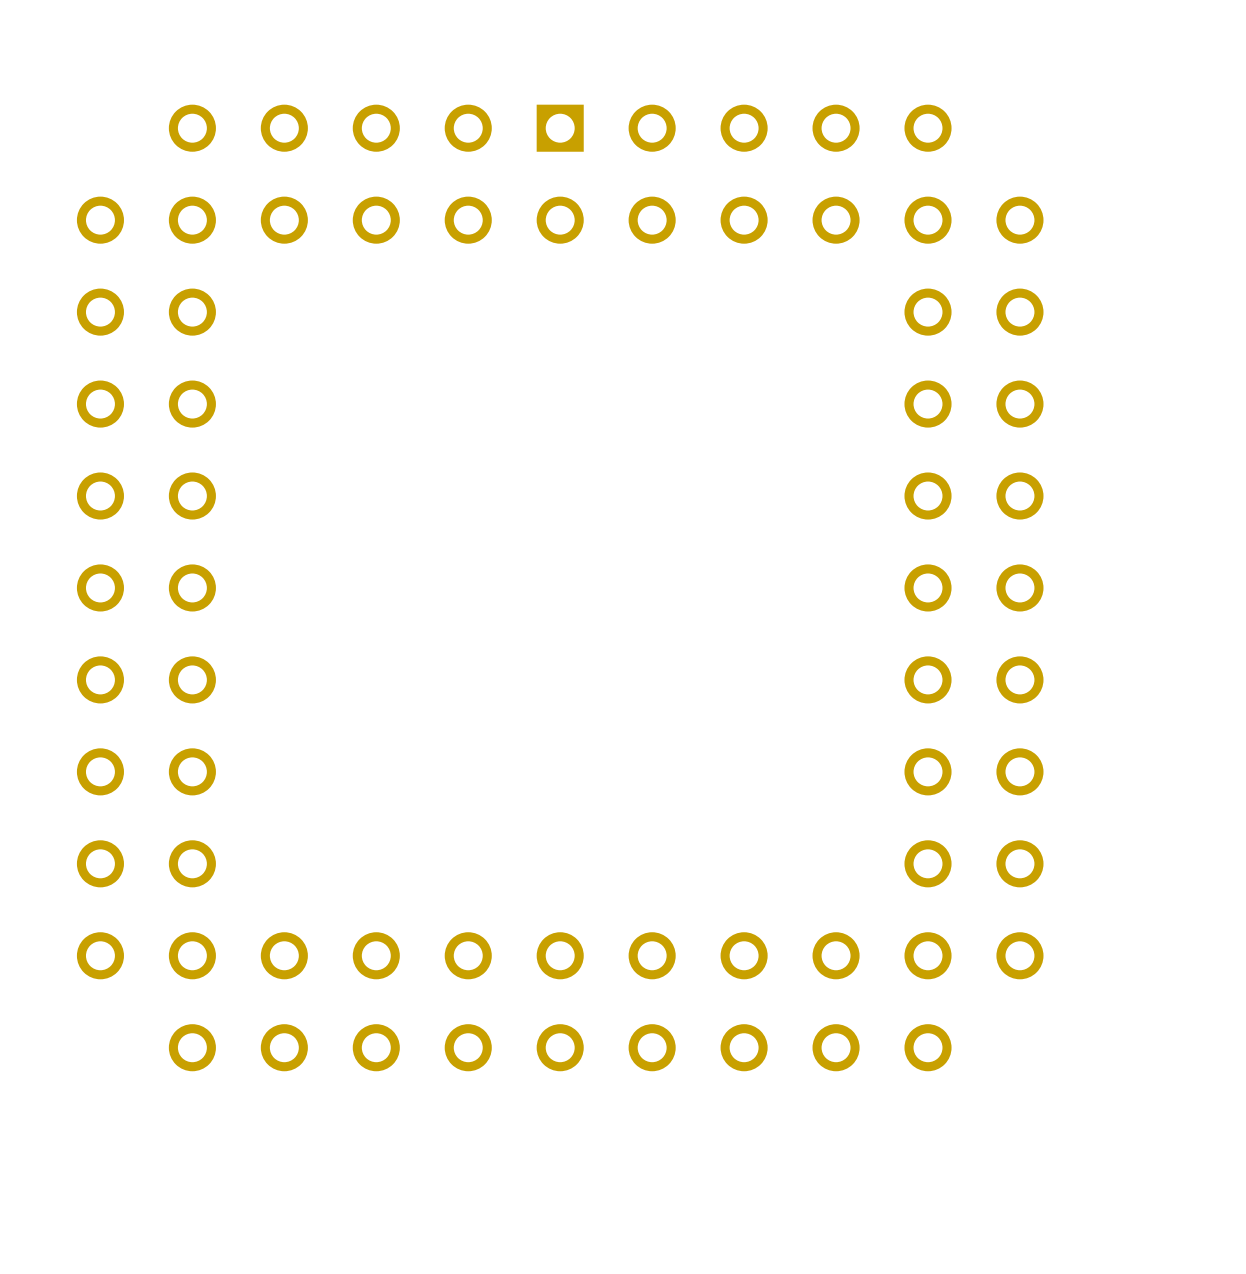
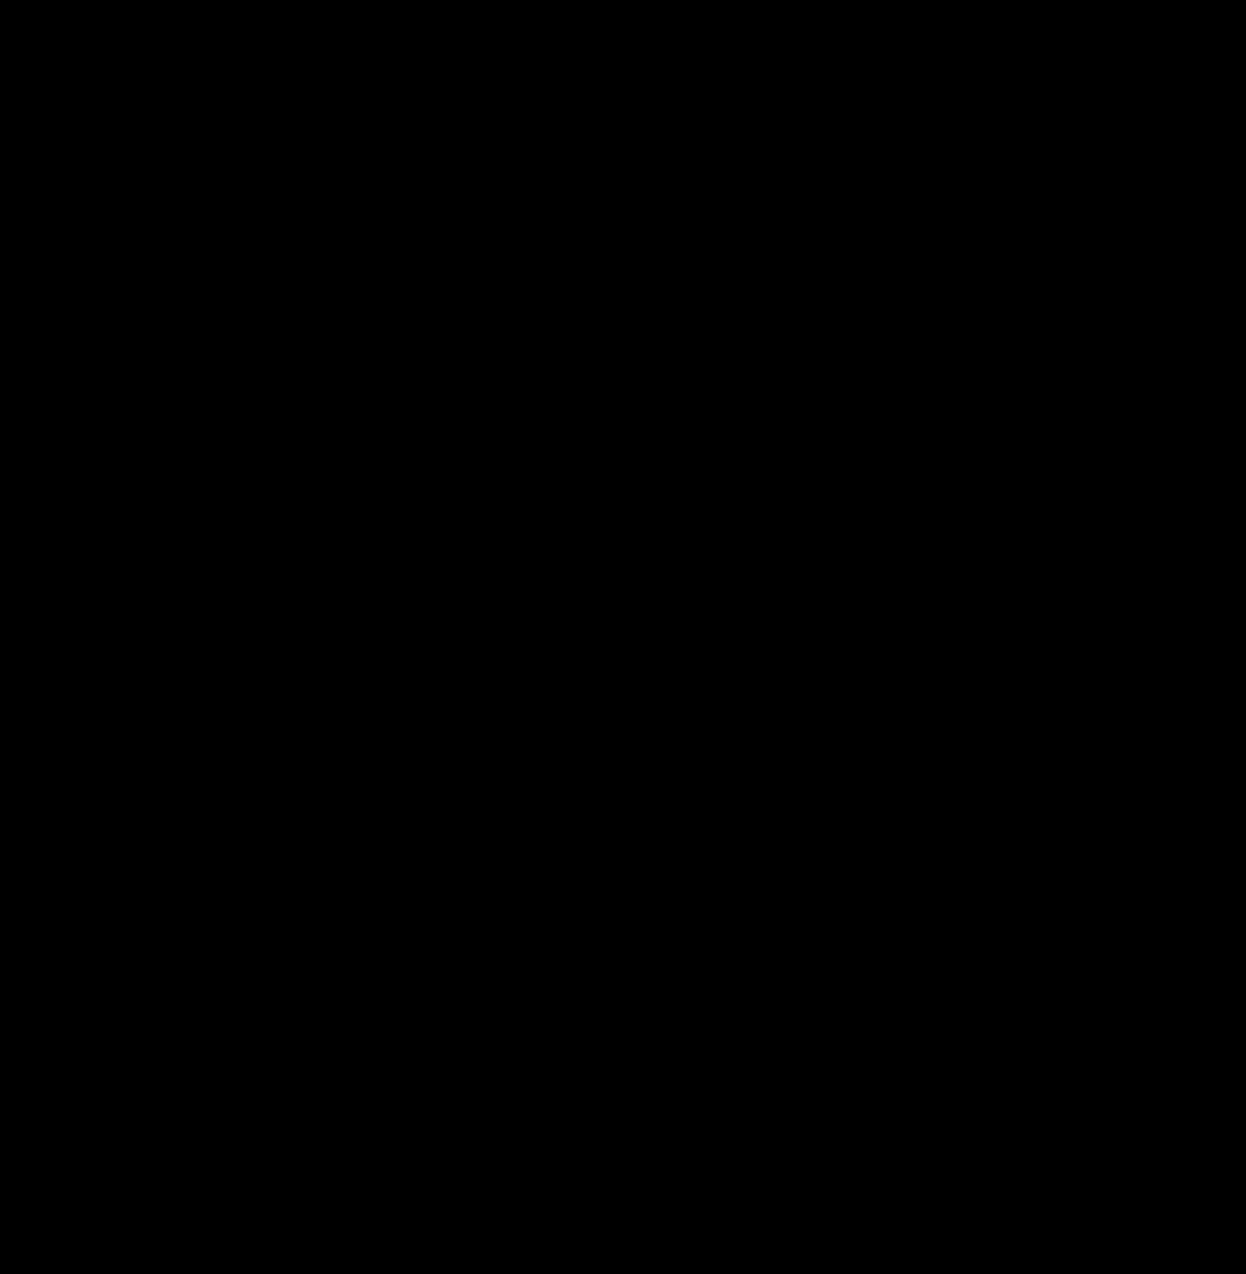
part: (560, 587) -> none

